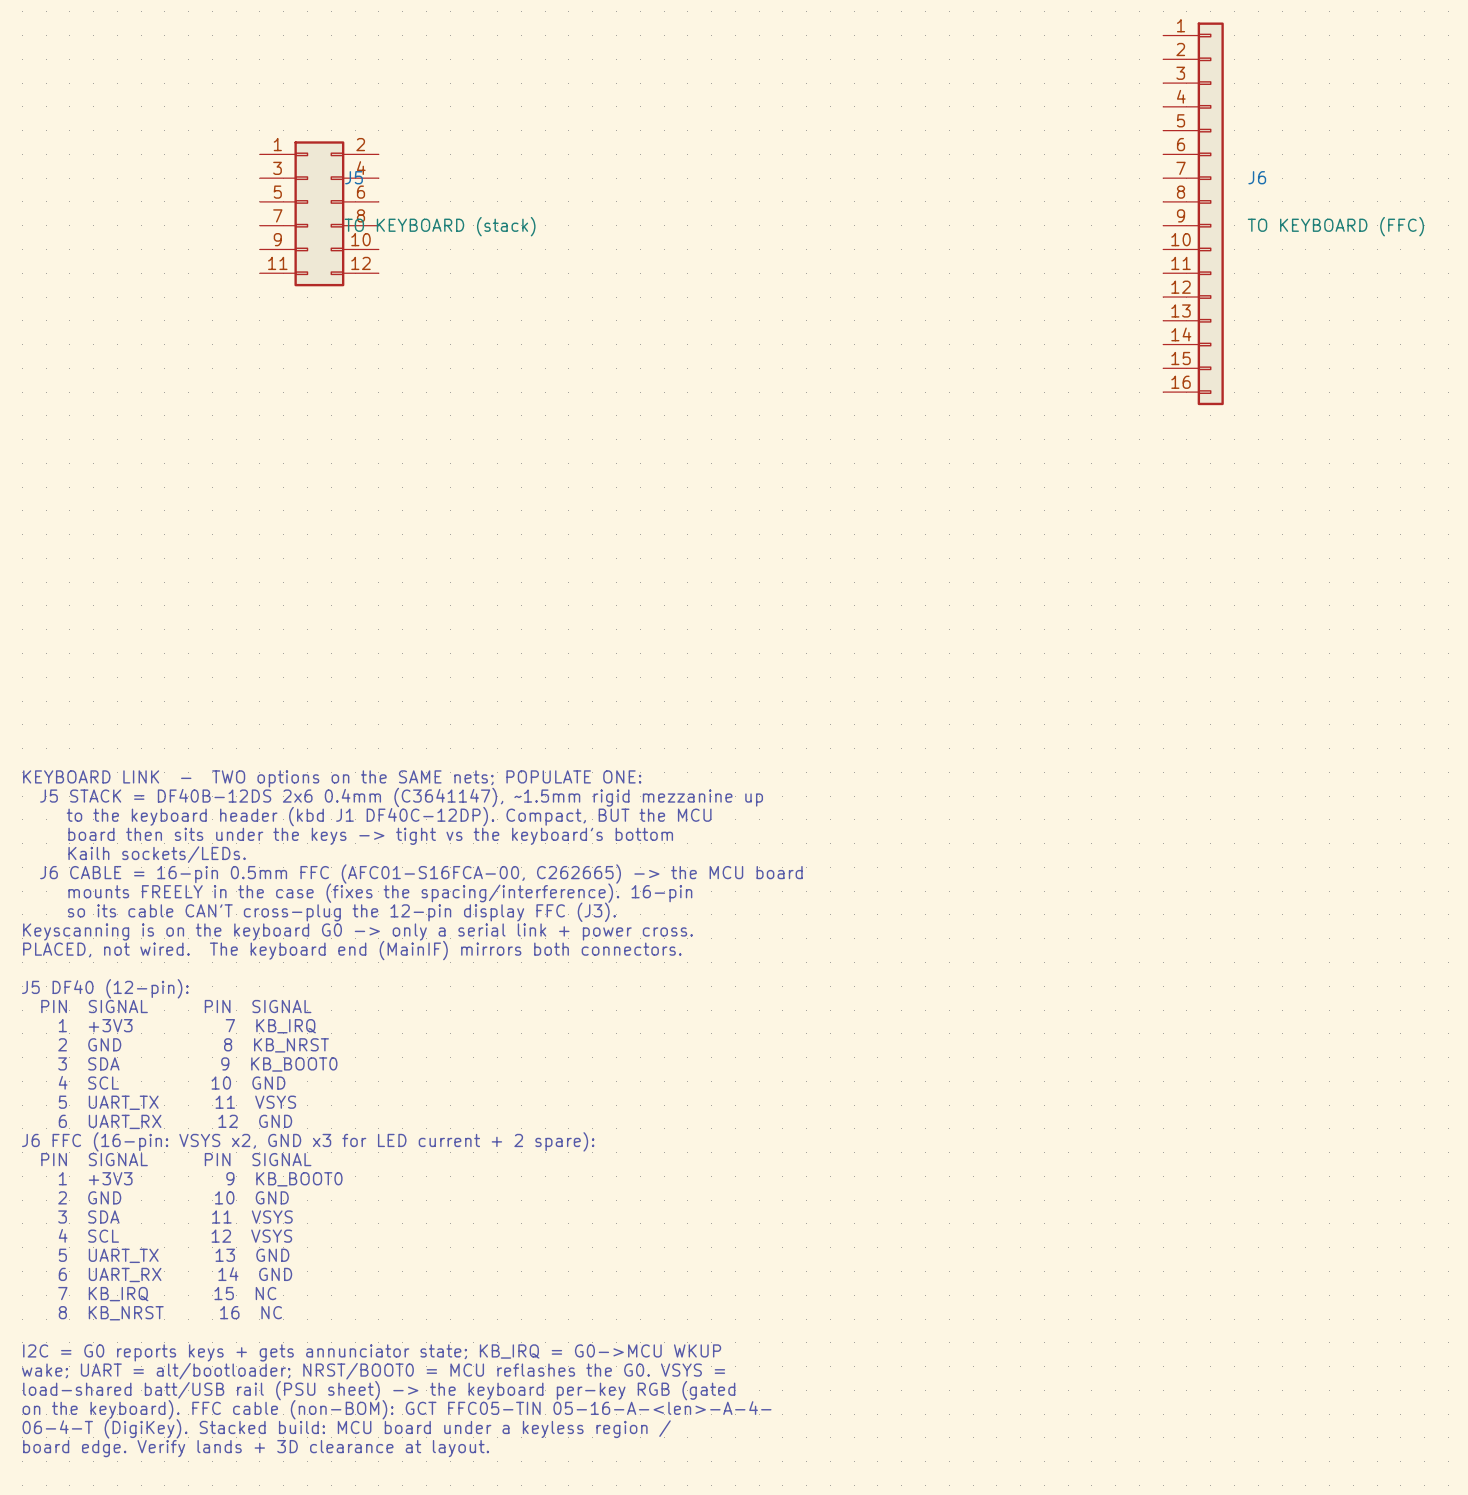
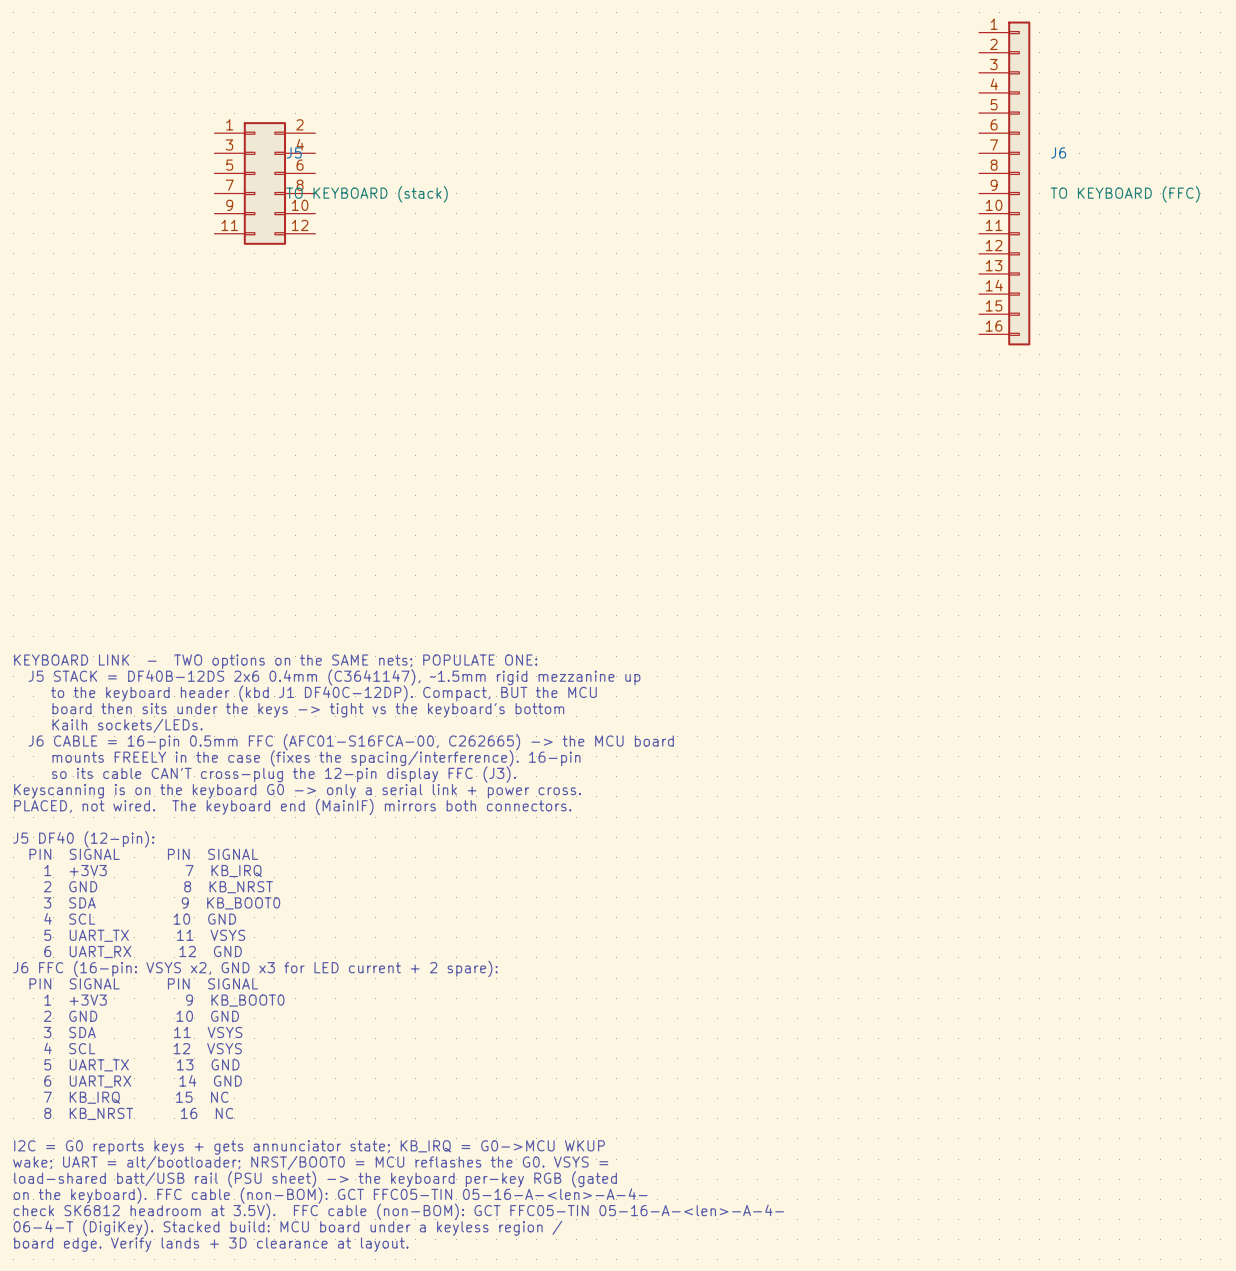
text: 06-4-T (DigiKey). Stacked build: MCU board under a keyless region / (346, 1428) -> check SK6812 headroom at 3.5V). FFC cable (non-BOM): GCT FFC05-TIN 05-16-A-<len>-A-4- (398, 1211)
text: board edge. Verify lands + 3D clearance at layout. (256, 1448) -> 06-4-T (DigiKey). Stacked build: MCU board under a keyless region / (287, 1227)
text: none -> board edge. Verify lands + 3D clearance at layout. (211, 1244)

